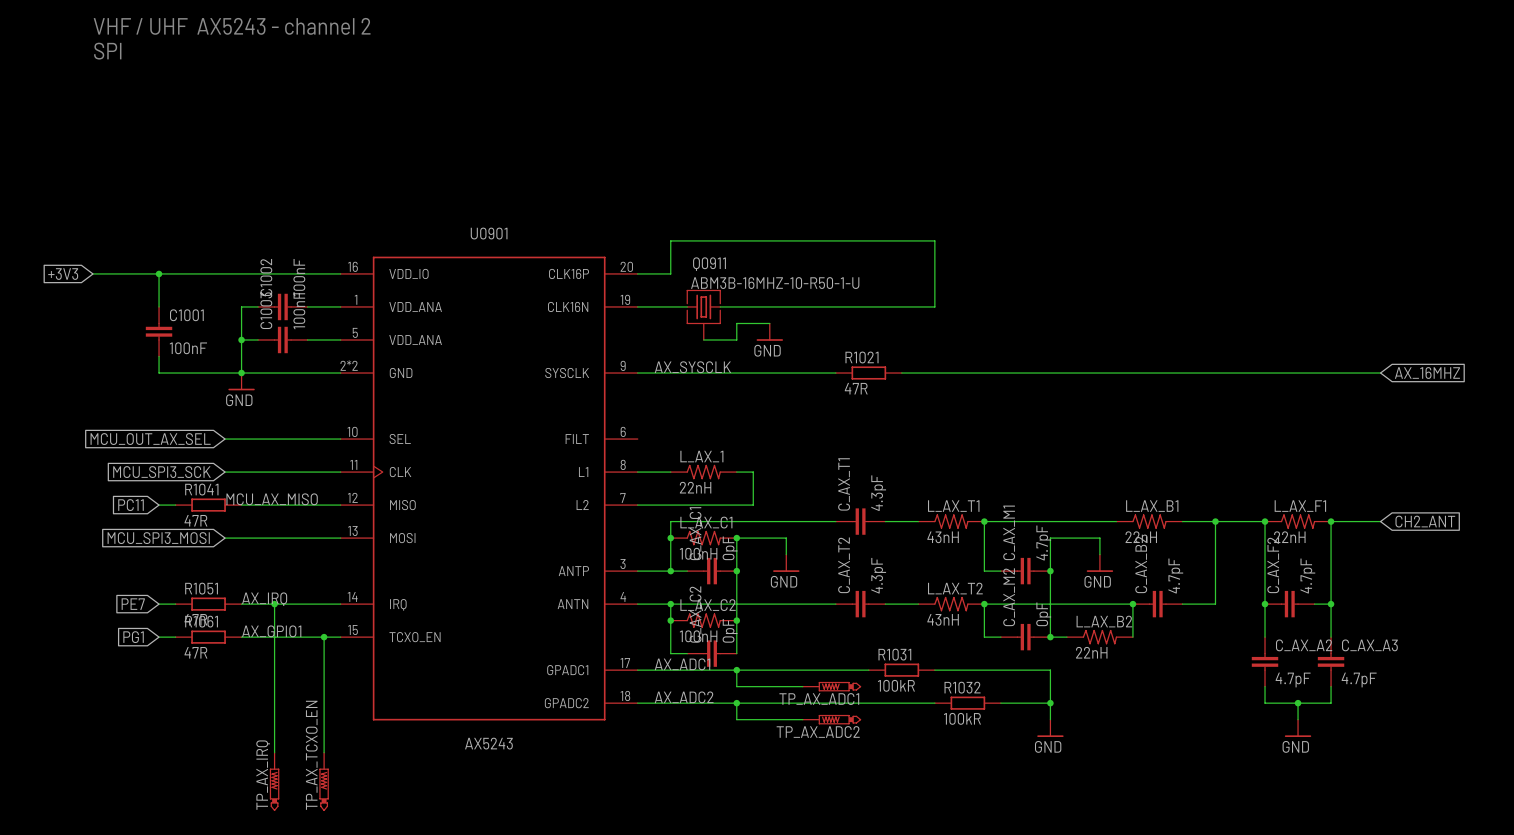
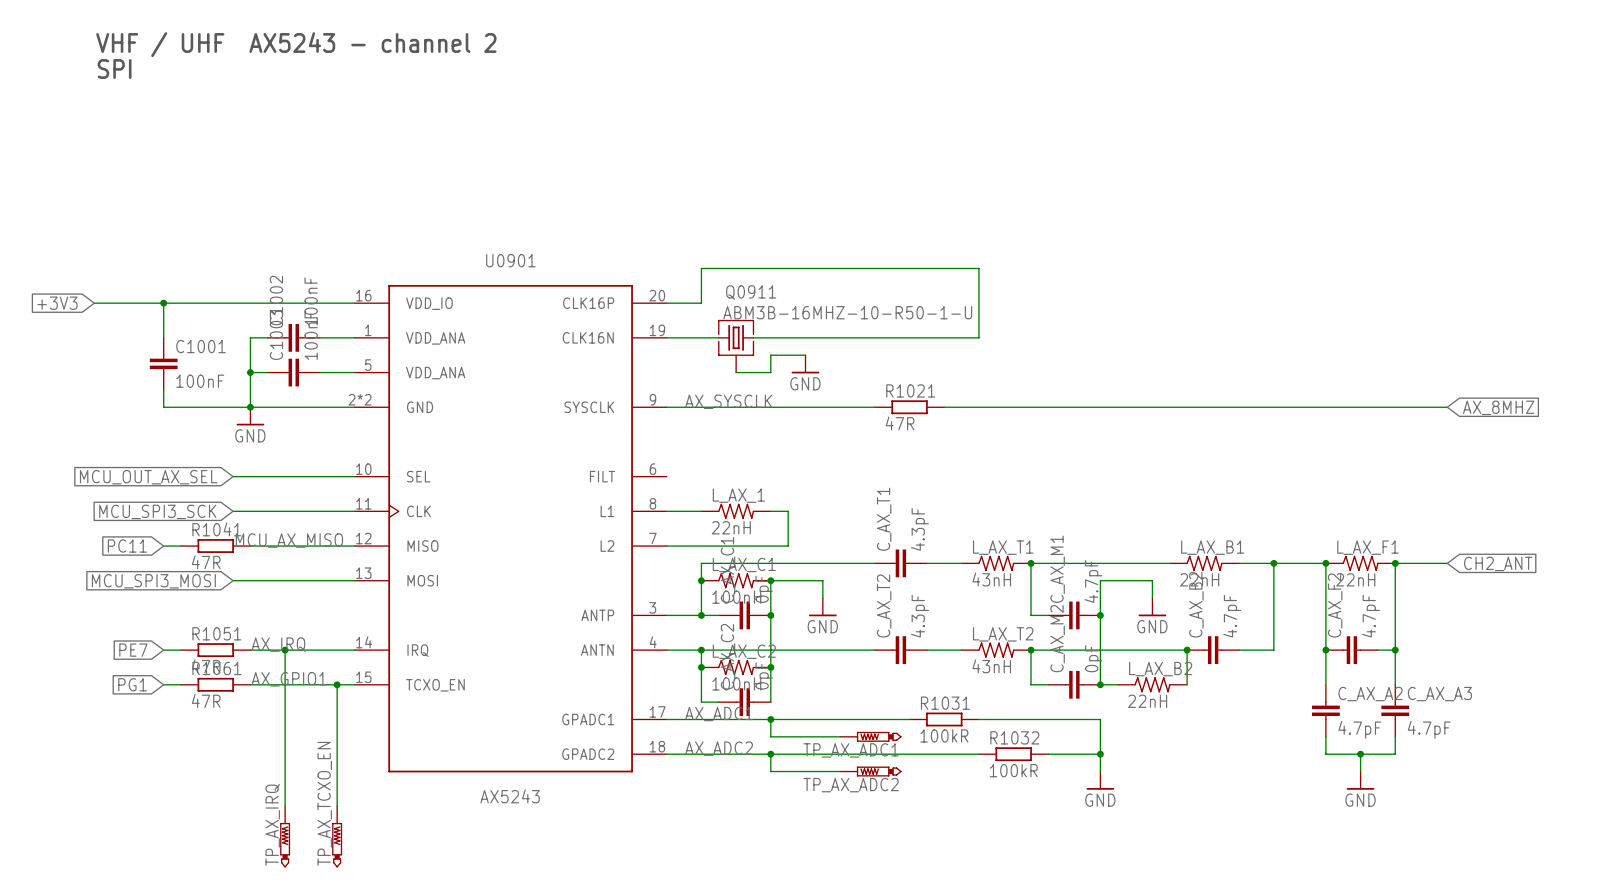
global label: AX_16MHZ (1427, 373) -> AX_8MHZ (1498, 407)

